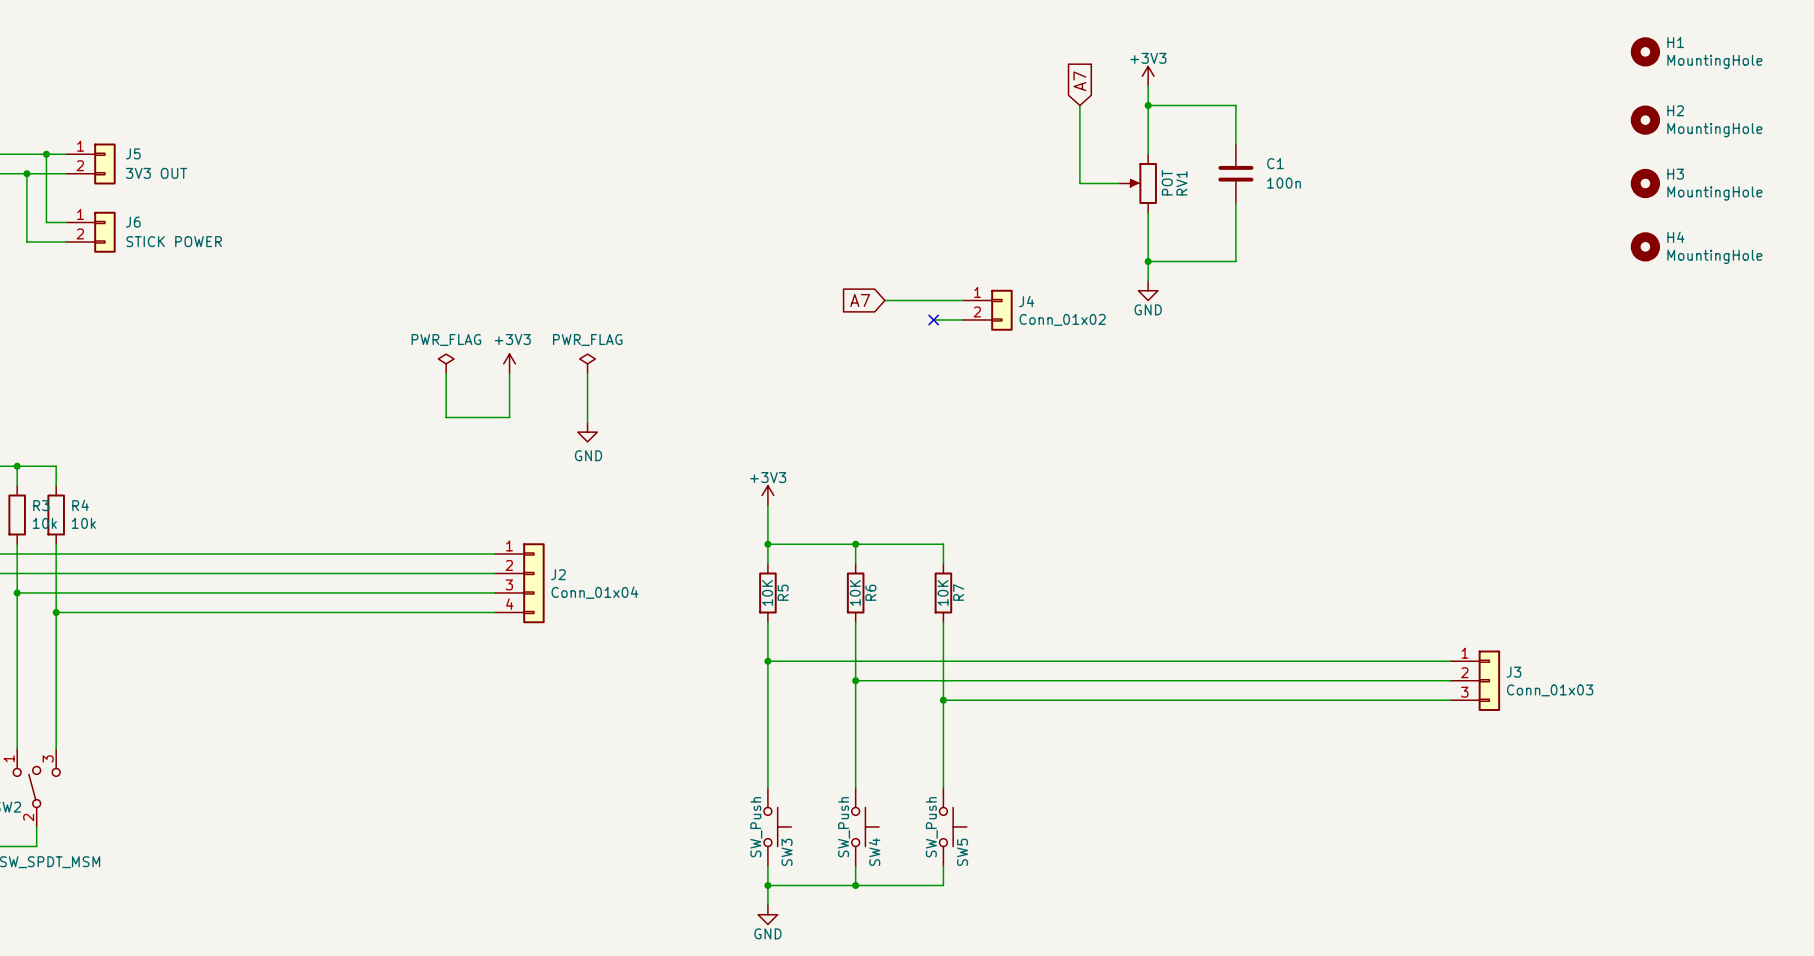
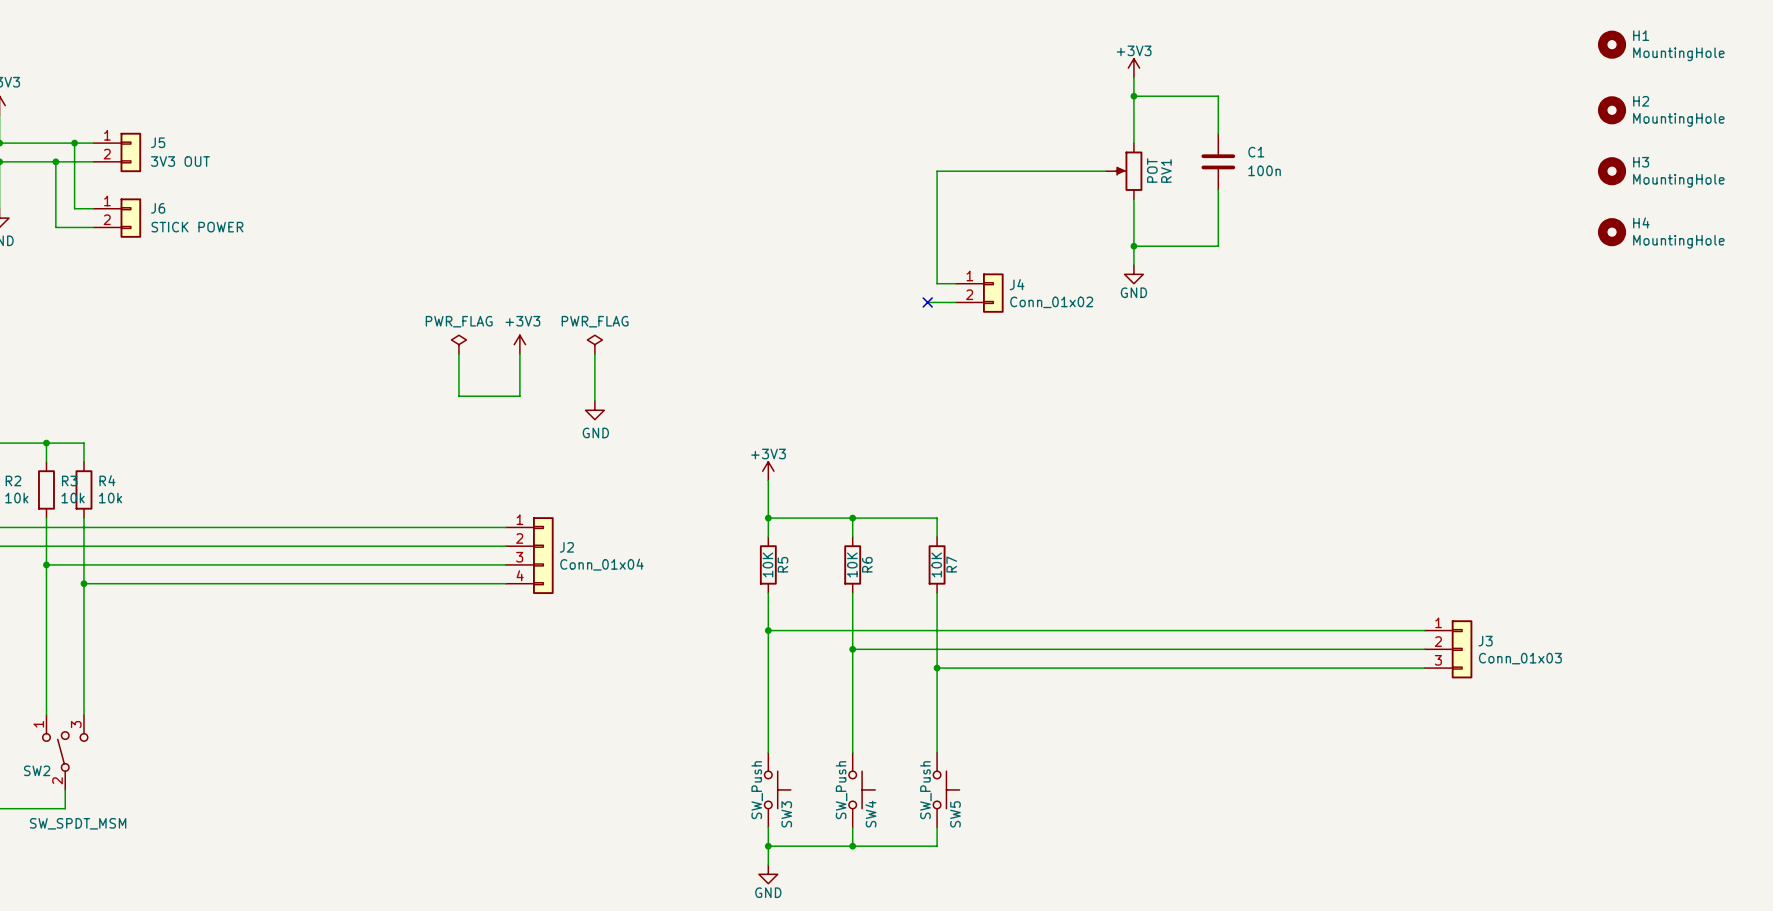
global label: A7 (1079, 81) -> none
wire: (1079, 105) (1079, 183) -> none
global label: A7 (860, 300) -> none
wire: (884, 300) (943, 300) -> (1068, 171) (937, 171) (937, 283)

